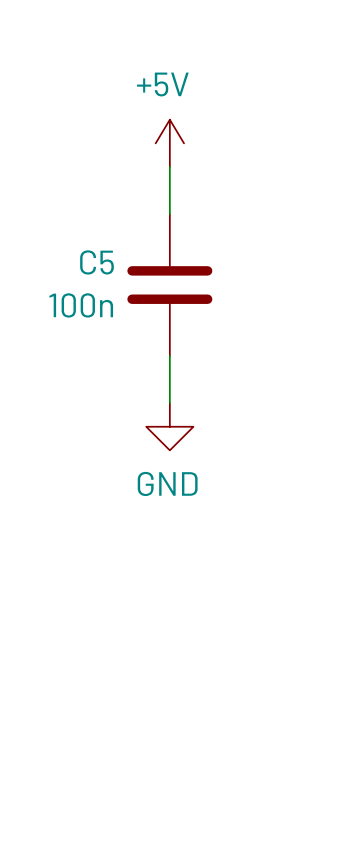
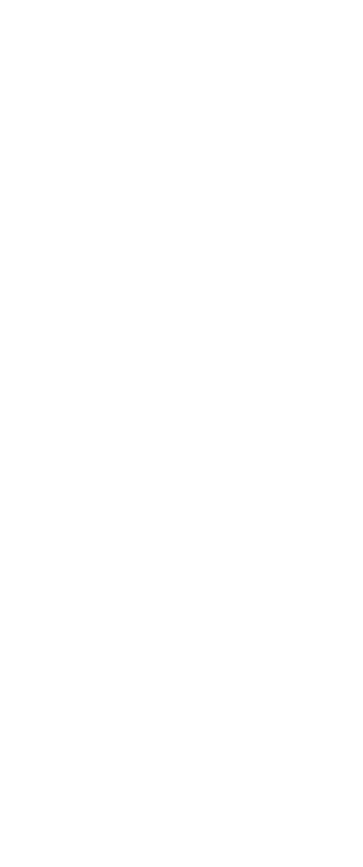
power symbol: +5V (169, 143) -> none
wire: (169, 166) (169, 214) -> none
C5: 100n (169, 285) -> none
wire: (169, 355) (169, 403) -> none
power symbol: GND (169, 426) -> none

